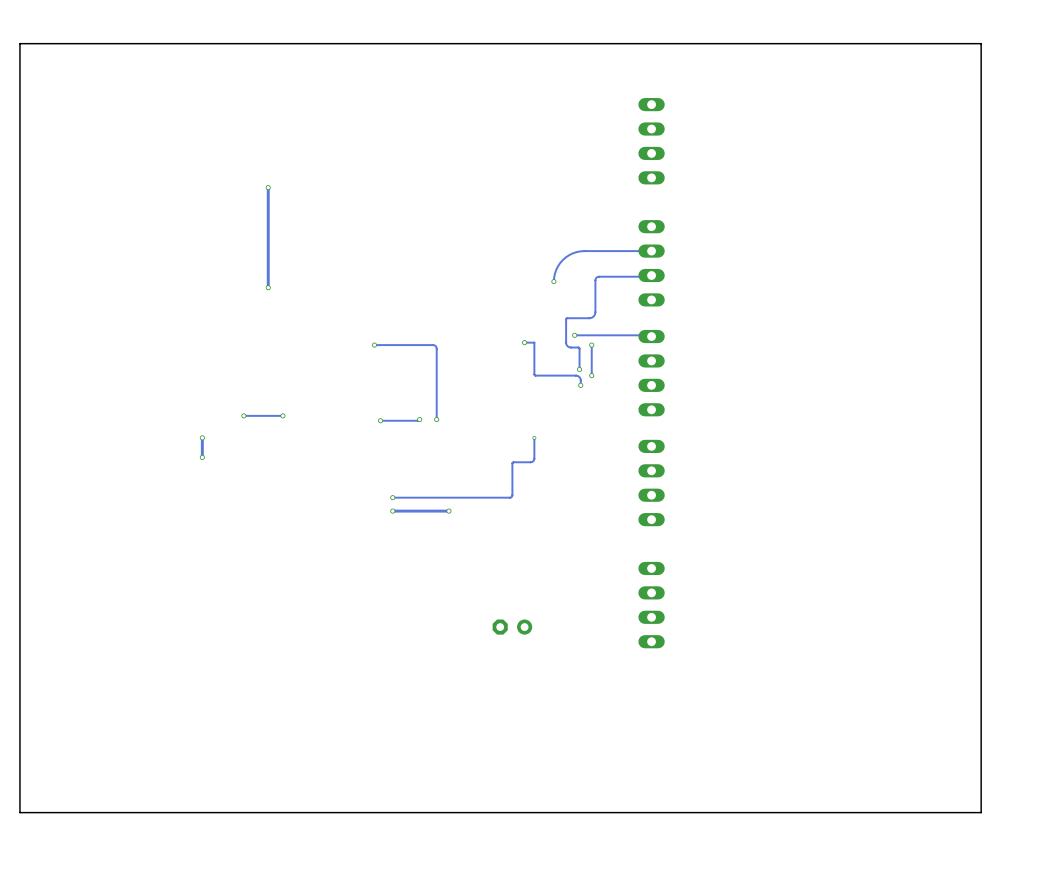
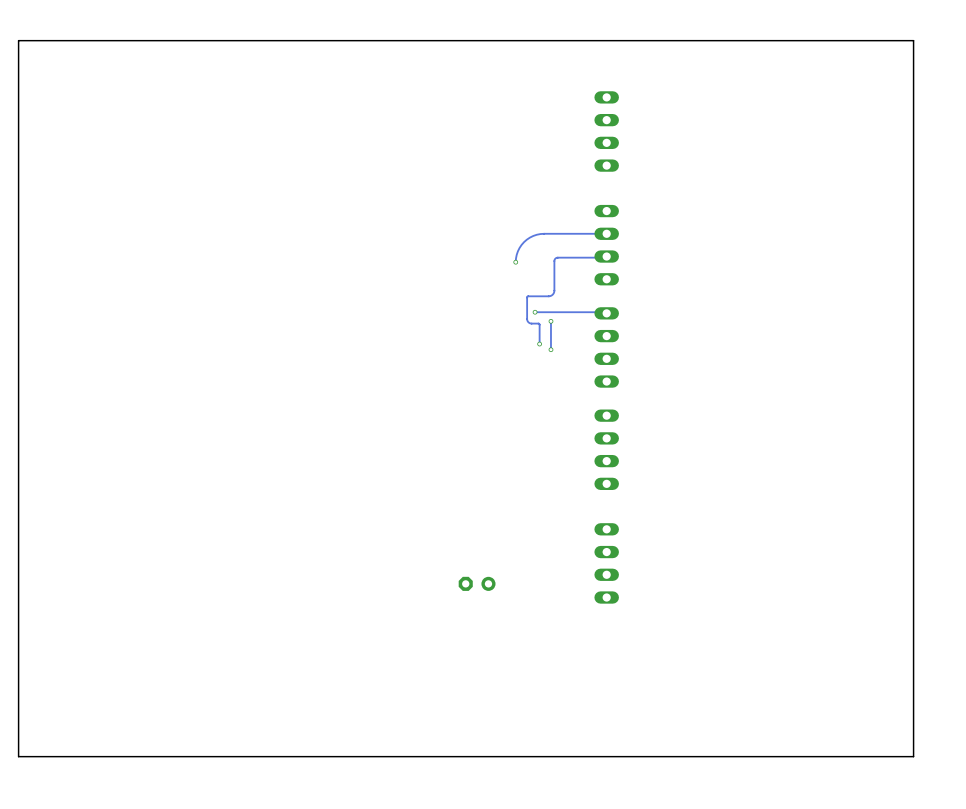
track: (268, 187) (268, 287) -> none
via: (268, 187) -> none
via: (268, 287) -> none
track: (524, 342) (534, 342) (534, 375) (577, 375) (580, 378) (580, 385) -> none
via: (524, 342) -> none
track: (374, 345) (435, 346) (436, 419) -> none
via: (374, 345) -> none
via: (580, 385) -> none
via: (243, 415) -> none
track: (282, 415) (243, 415) -> none
via: (282, 415) -> none
track: (419, 419) (380, 420) -> none
via: (419, 419) -> none
via: (436, 419) -> none
via: (380, 420) -> none
track: (202, 437) (202, 457) -> none
via: (202, 437) -> none
track: (534, 437) (533, 460) (512, 463) (510, 497) (392, 497) -> none
via: (534, 437) -> none
via: (202, 457) -> none
via: (392, 497) -> none
via: (392, 511) -> none
track: (448, 511) (392, 511) -> none
via: (448, 511) -> none

